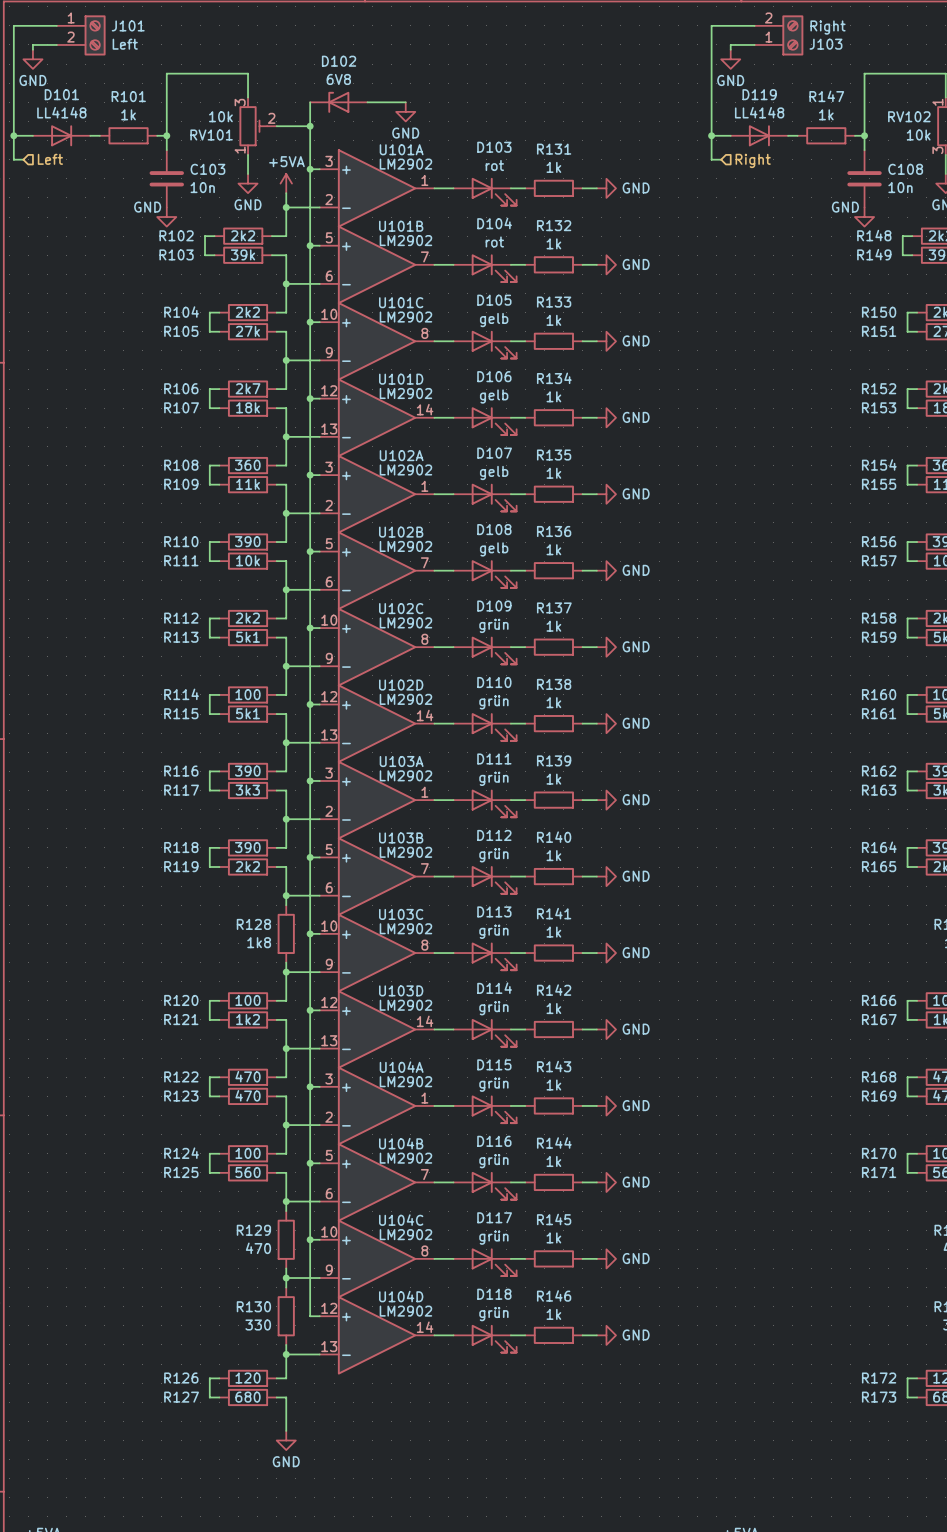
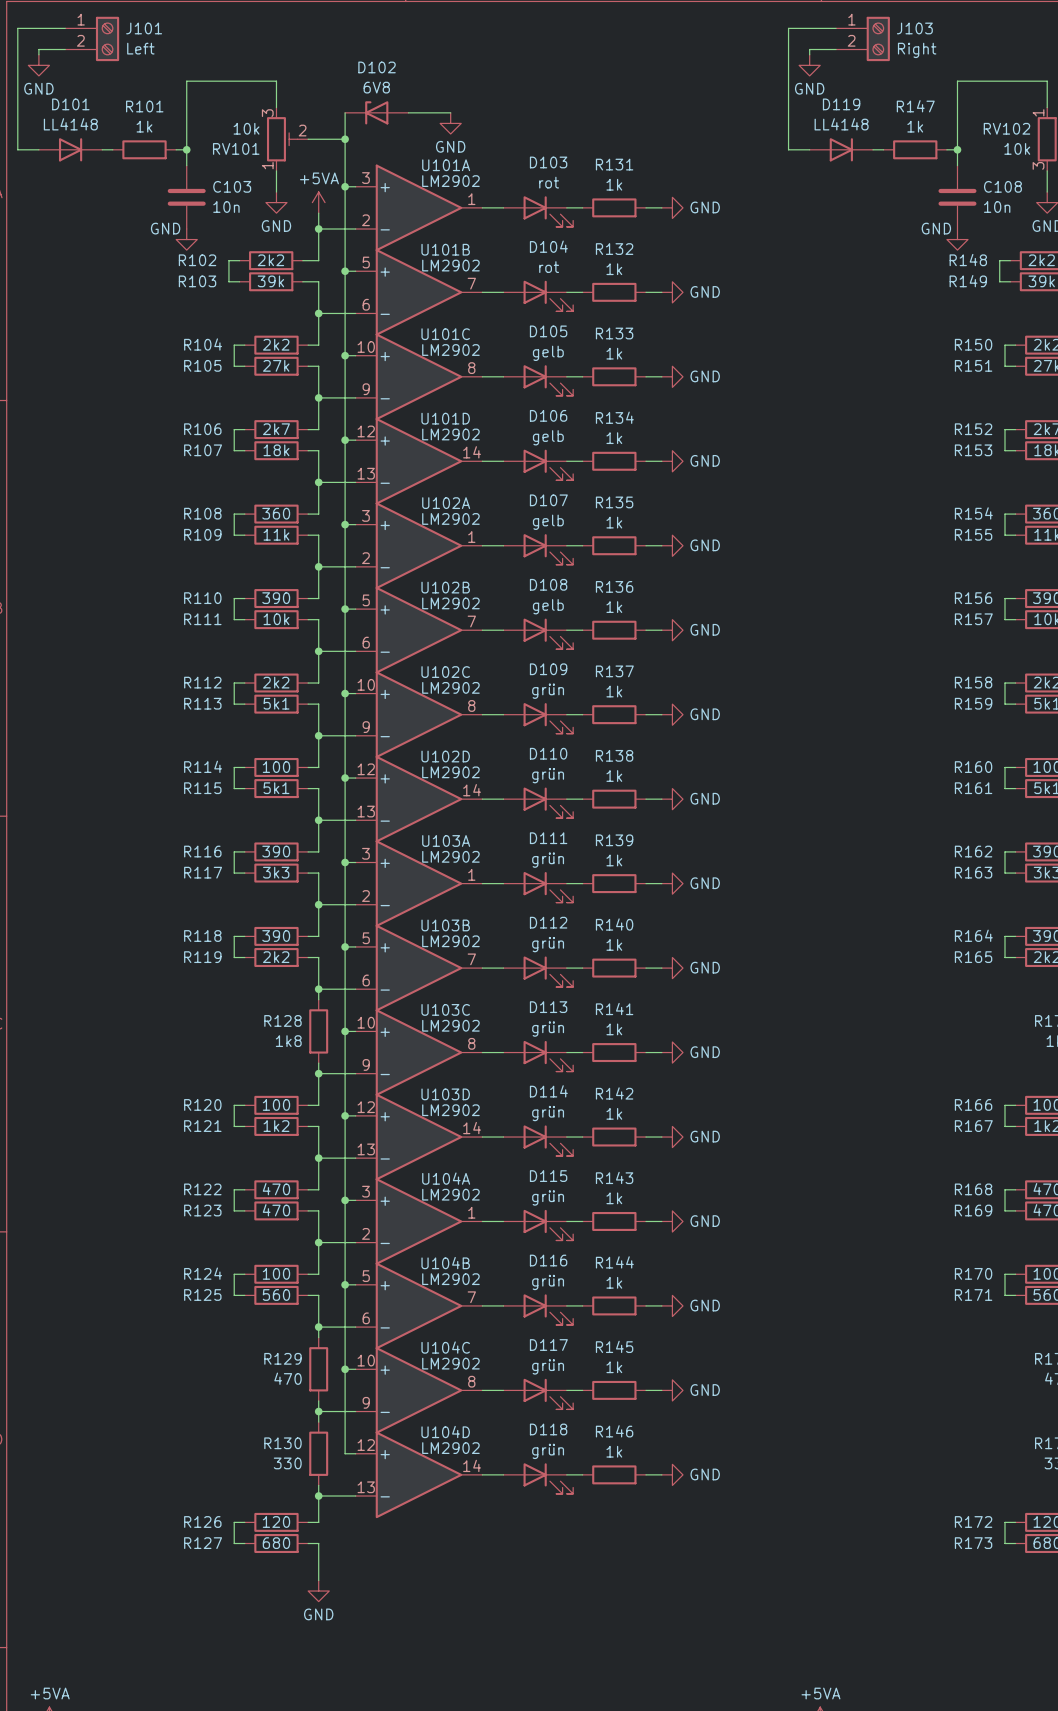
J103 flip: as is (792, 35) -> up-down (878, 38)
wire: (13, 135) (13, 159) (23, 159) -> none
junction: (13, 135) -> none
wire: (711, 135) (711, 159) (721, 159) -> none
junction: (711, 135) -> none
hierarchical label: Left (50, 159) -> none
hierarchical label: Right (753, 160) -> none

